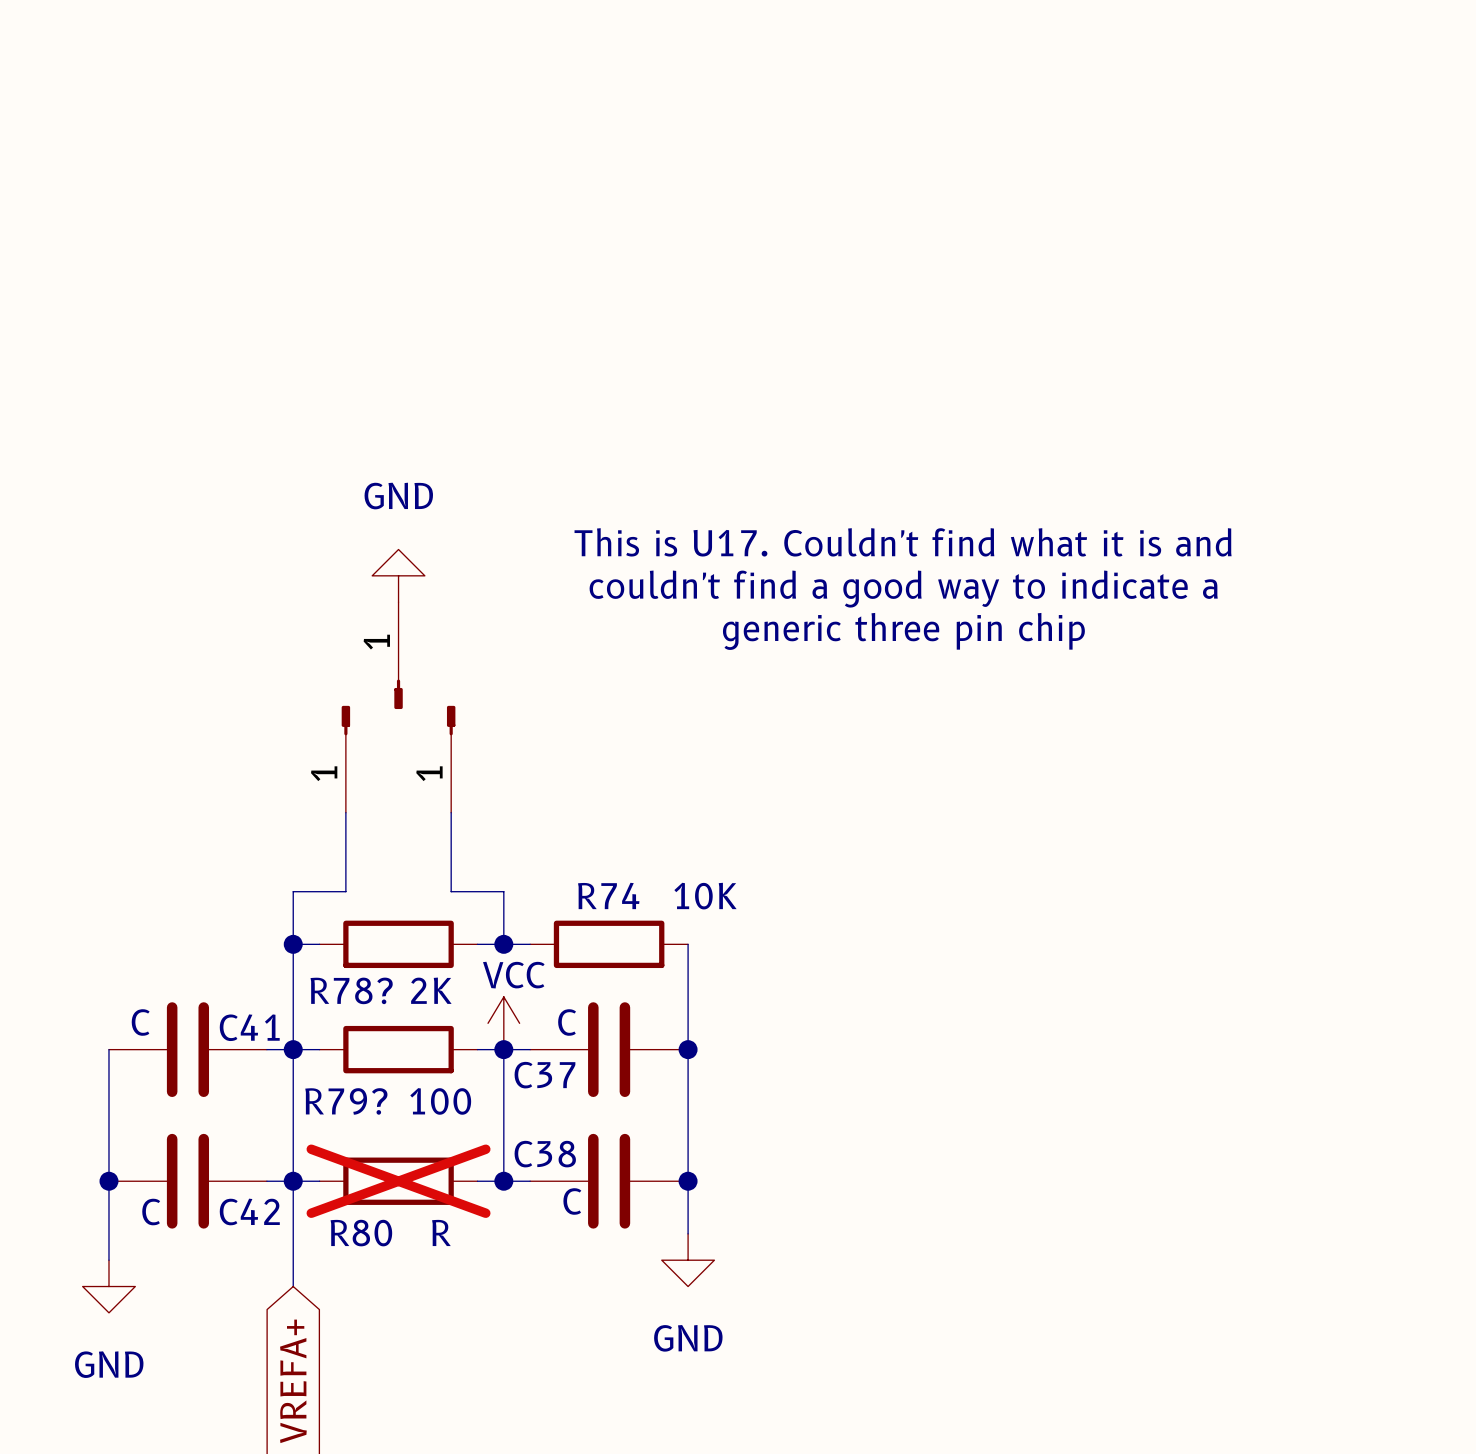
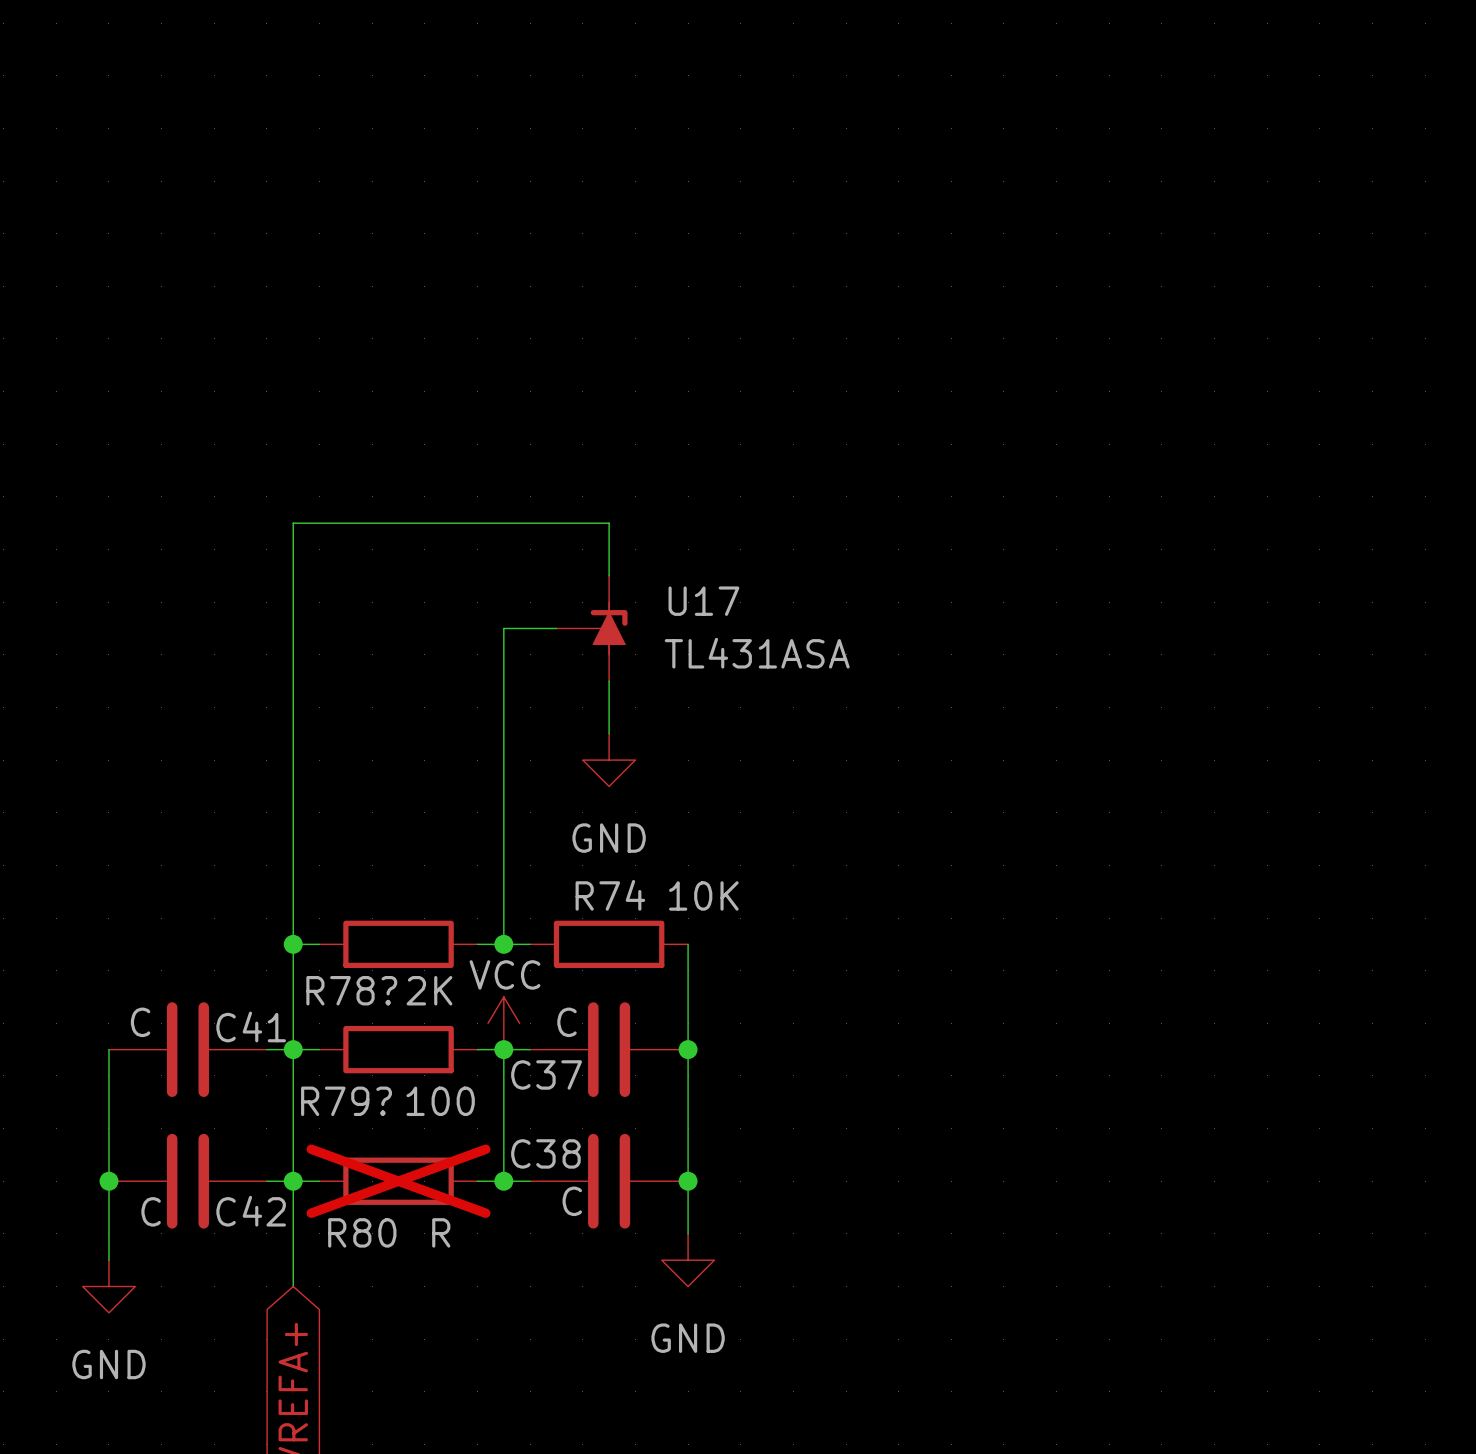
text: This is U17. Couldn't find what it is and (903, 542) -> none
power symbol rotation: 0° (398, 575) -> 180° (609, 760)
power symbol position: GND (398, 575) -> GND (609, 760)
text: couldn't find a good way to indicate a (903, 589) -> none
U17: none -> TL431ASA (592, 628)
text: generic three pin chip (903, 631) -> none
part: (398, 655) -> none
wire: none -> (609, 681) (609, 733)
part: (345, 759) -> none
part: (451, 759) -> none
wire: (345, 812) (345, 891) (293, 891) -> (609, 575) (609, 523) (293, 523) (293, 891)
wire: (451, 812) (451, 891) (503, 891) -> (556, 628) (503, 628) (503, 891)

